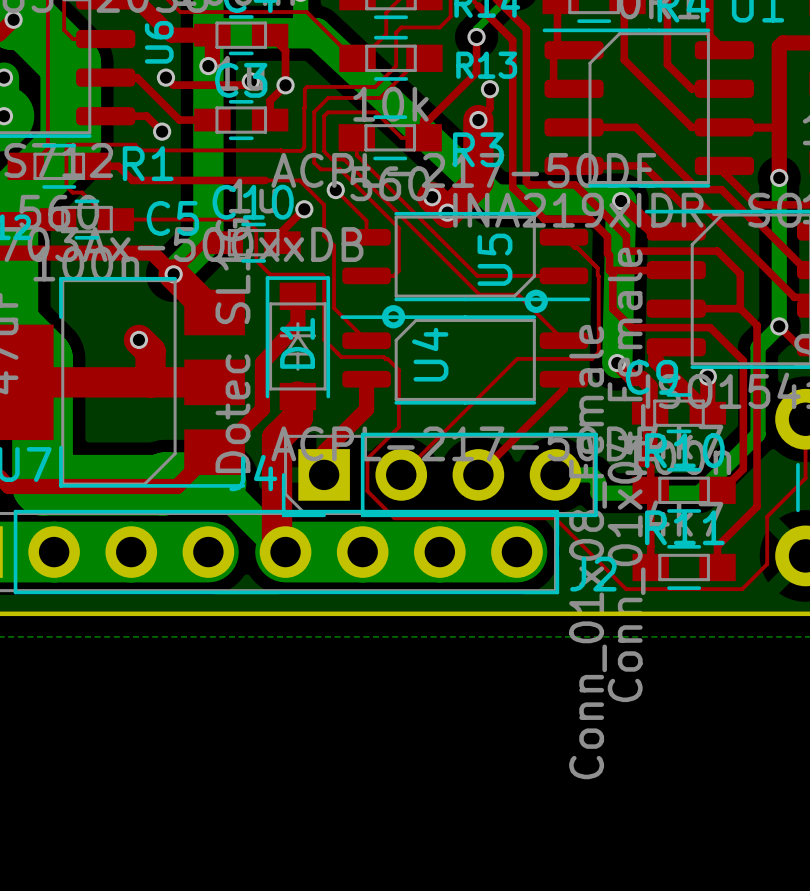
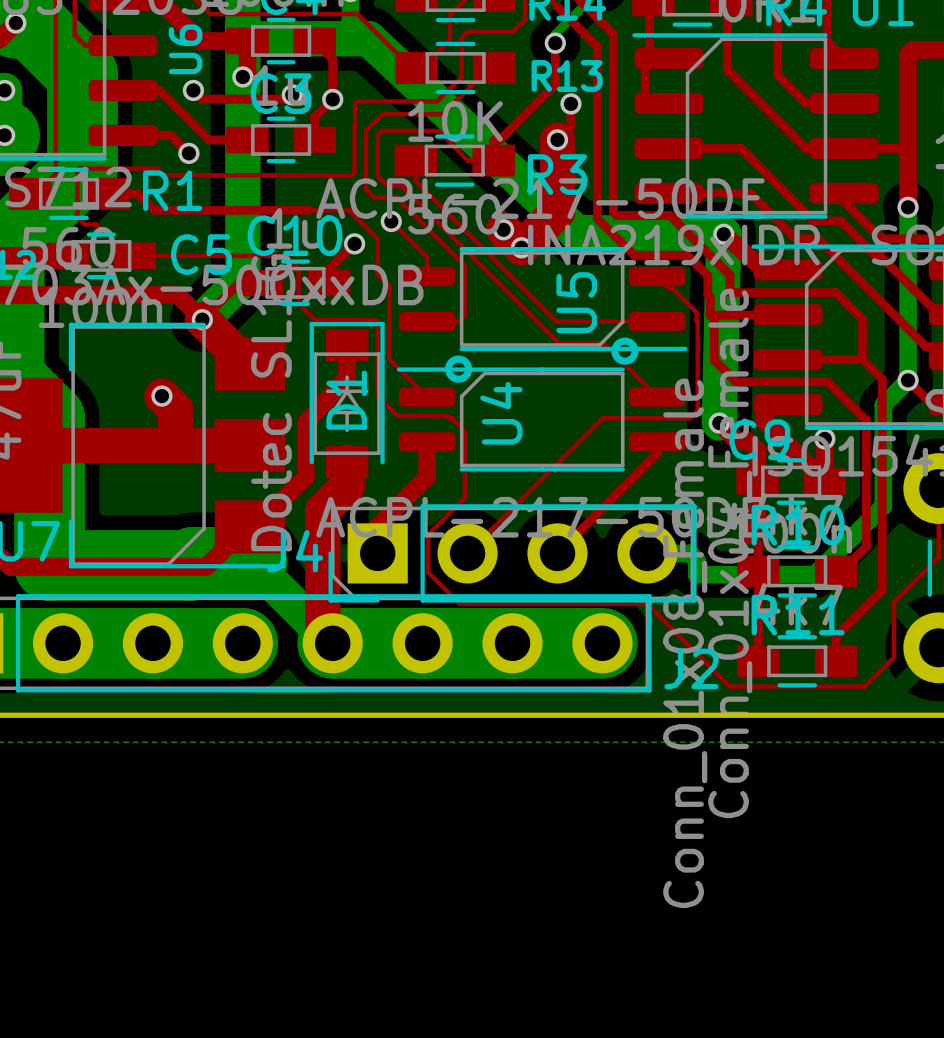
R13 value: 10k (390, 104) -> 10K (455, 121)

